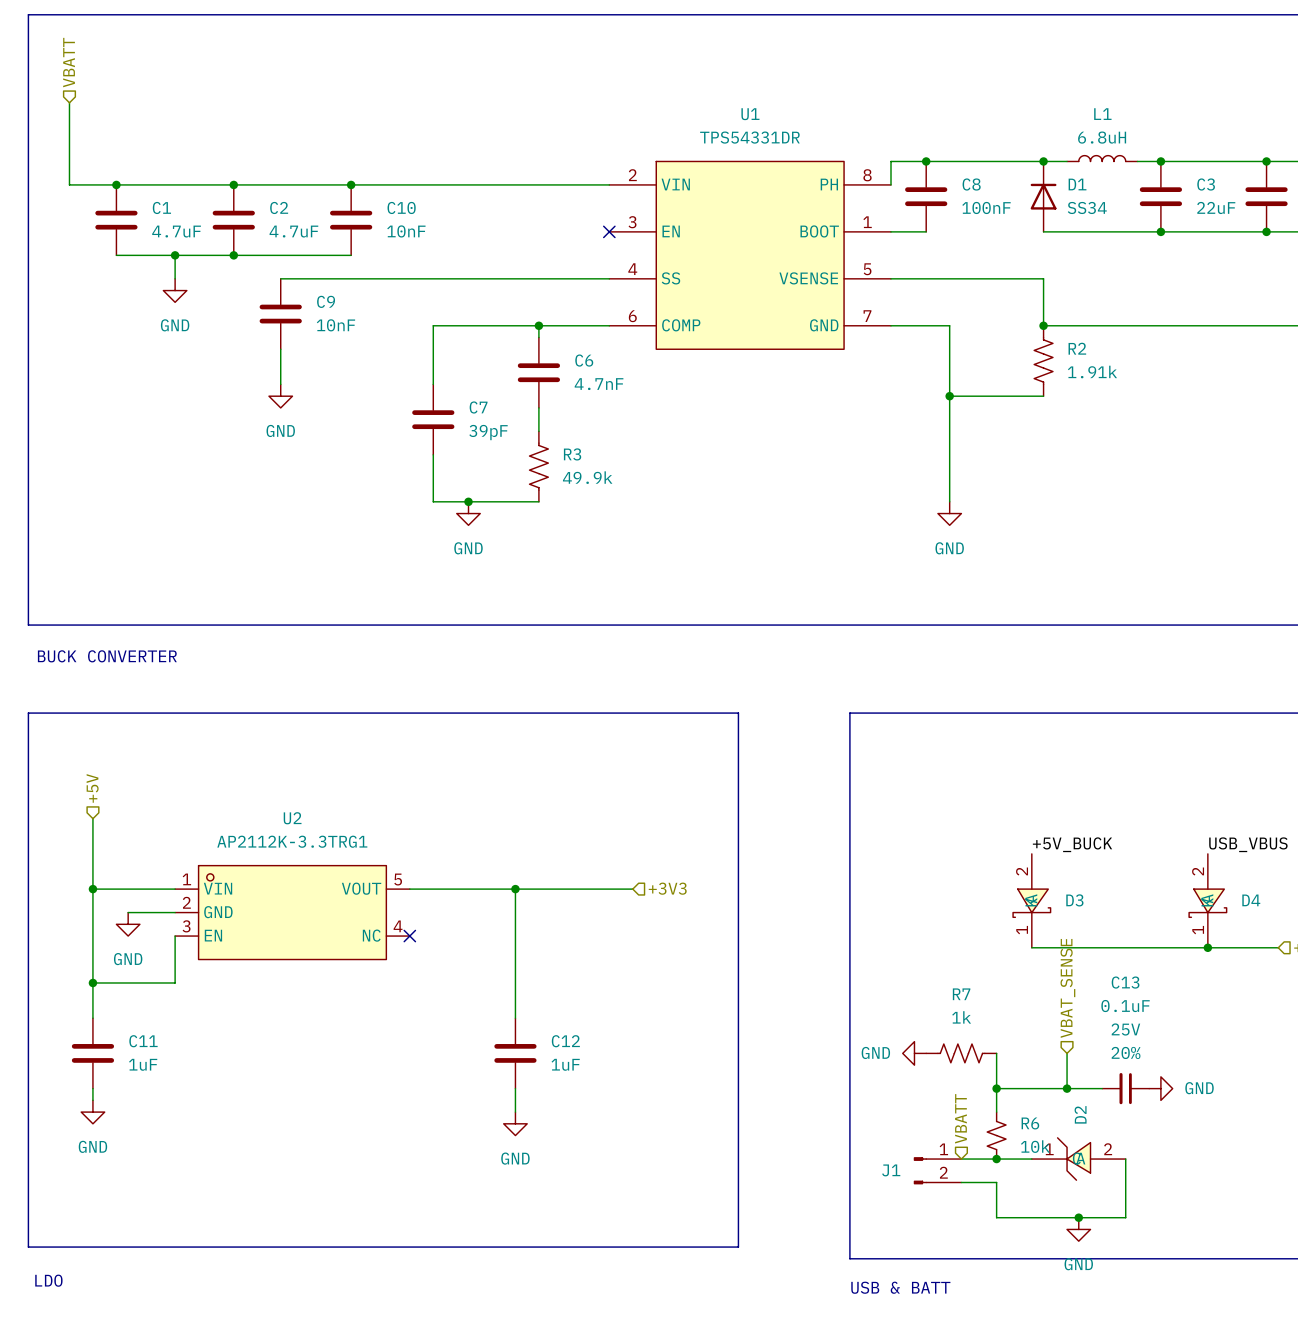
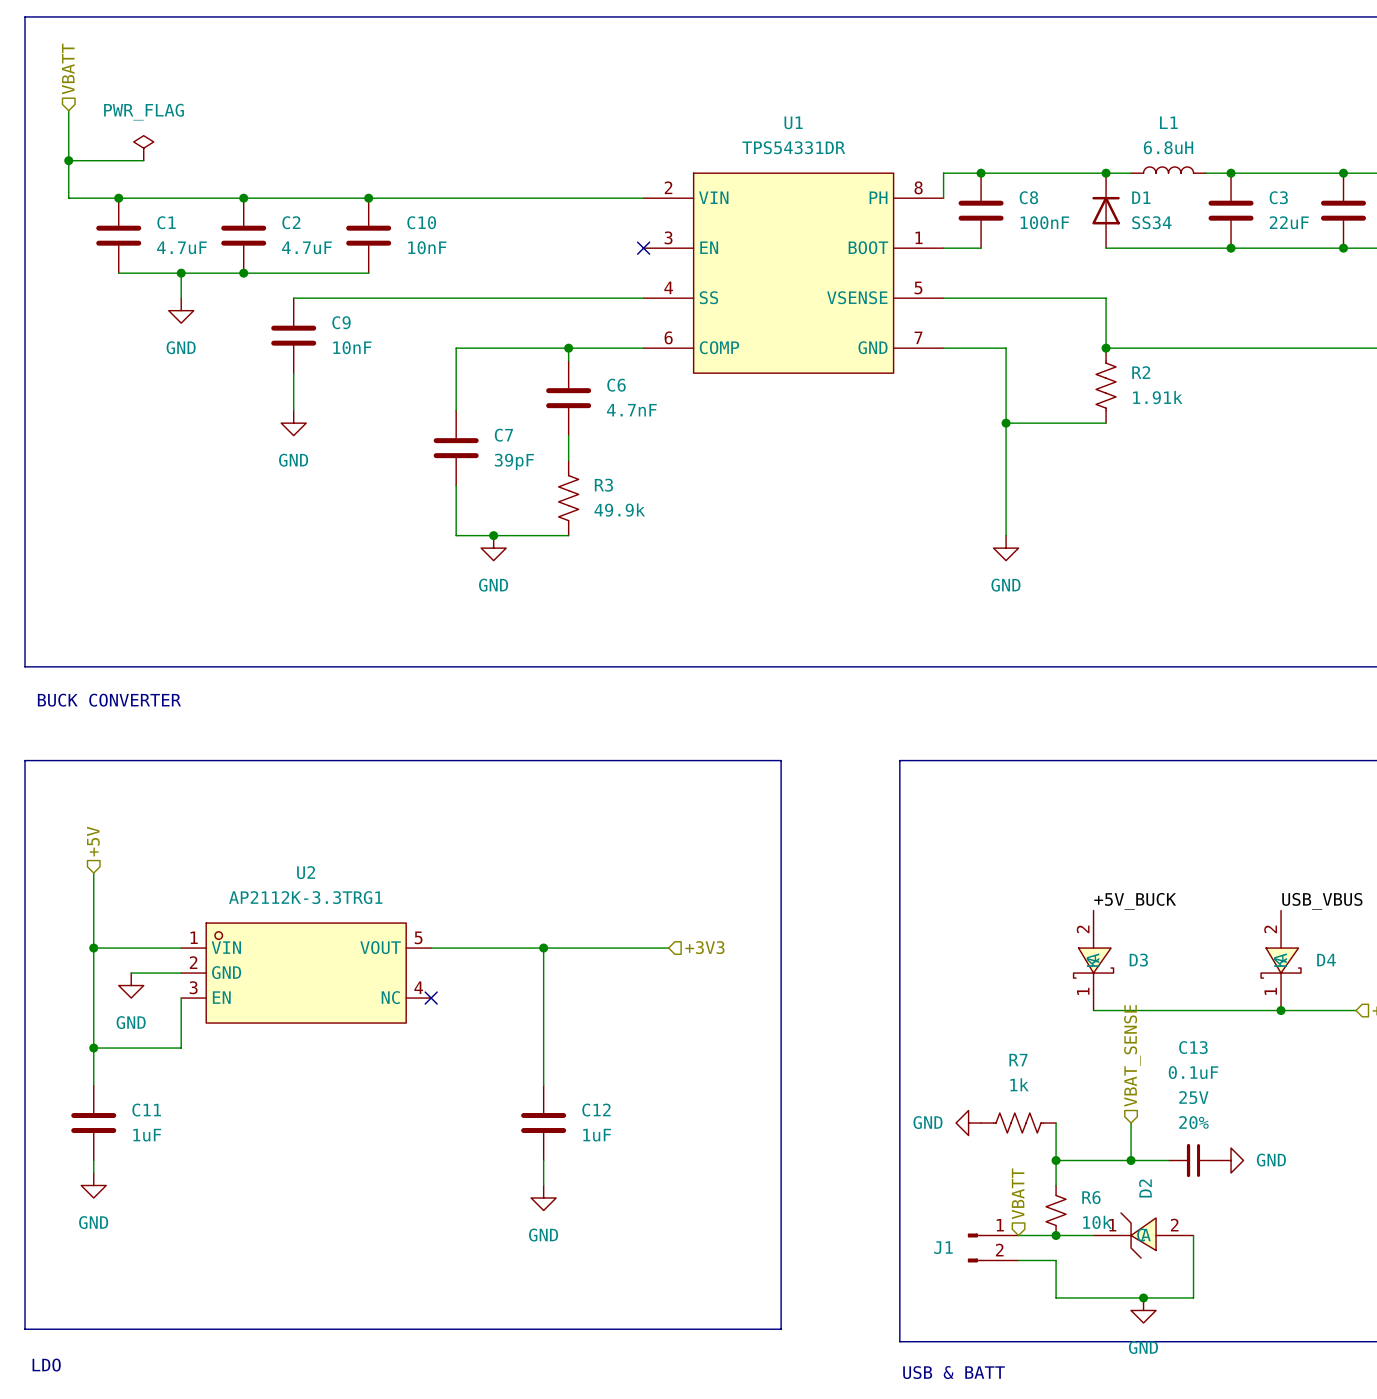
power symbol: none -> PWR_FLAG (143, 148)
wire: none -> (68, 160) (143, 160)
junction: none -> (68, 160)

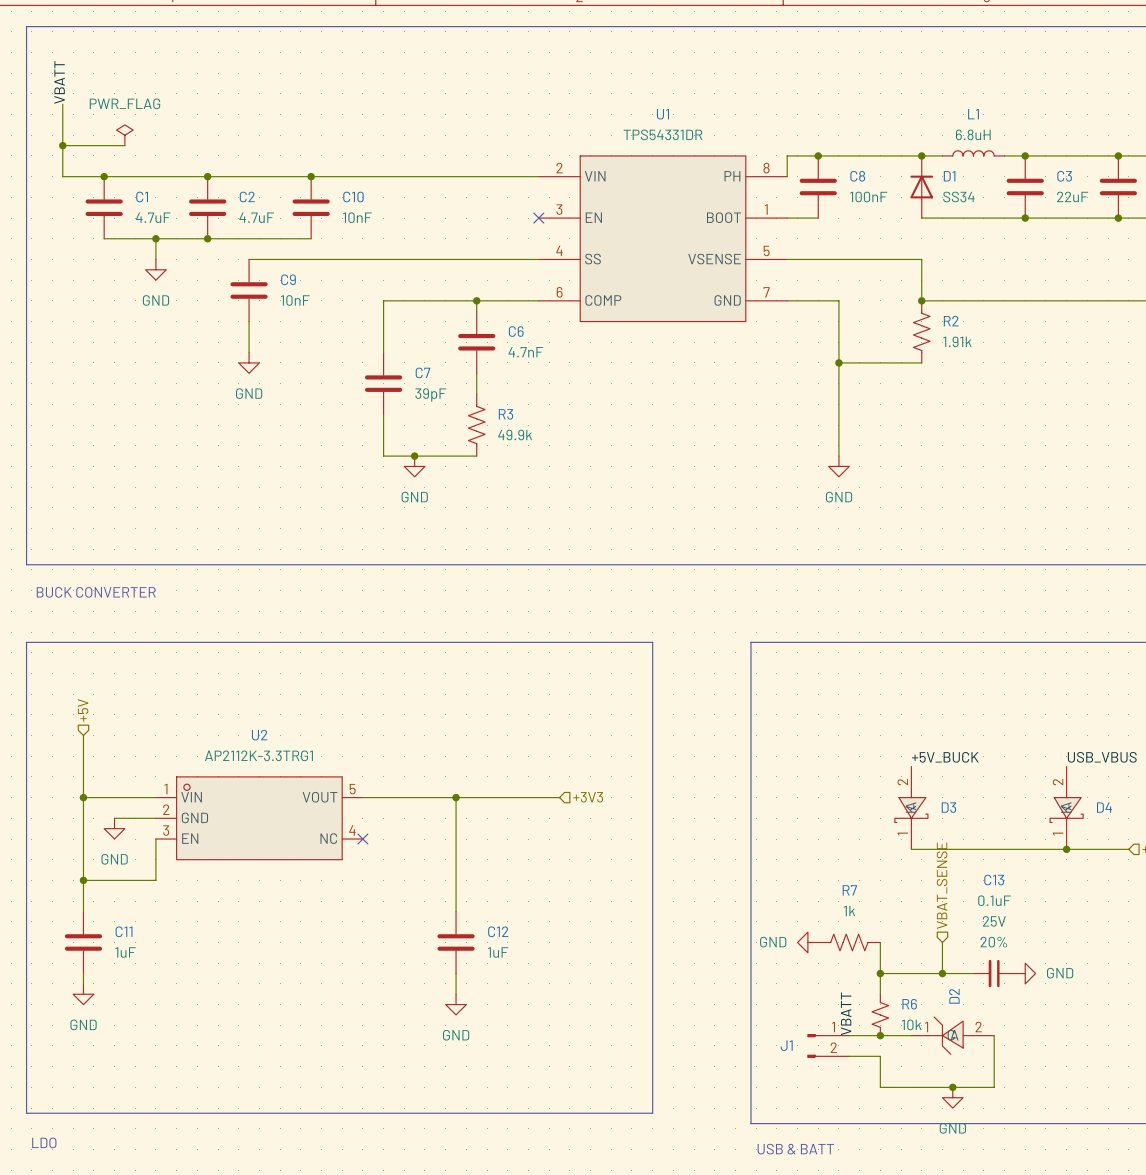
hierarchical label: VBATT (68, 68) -> none
label: none -> VBATT (59, 82)
hierarchical label: VBATT (1018, 1193) -> none
label: none -> VBATT (846, 1013)

